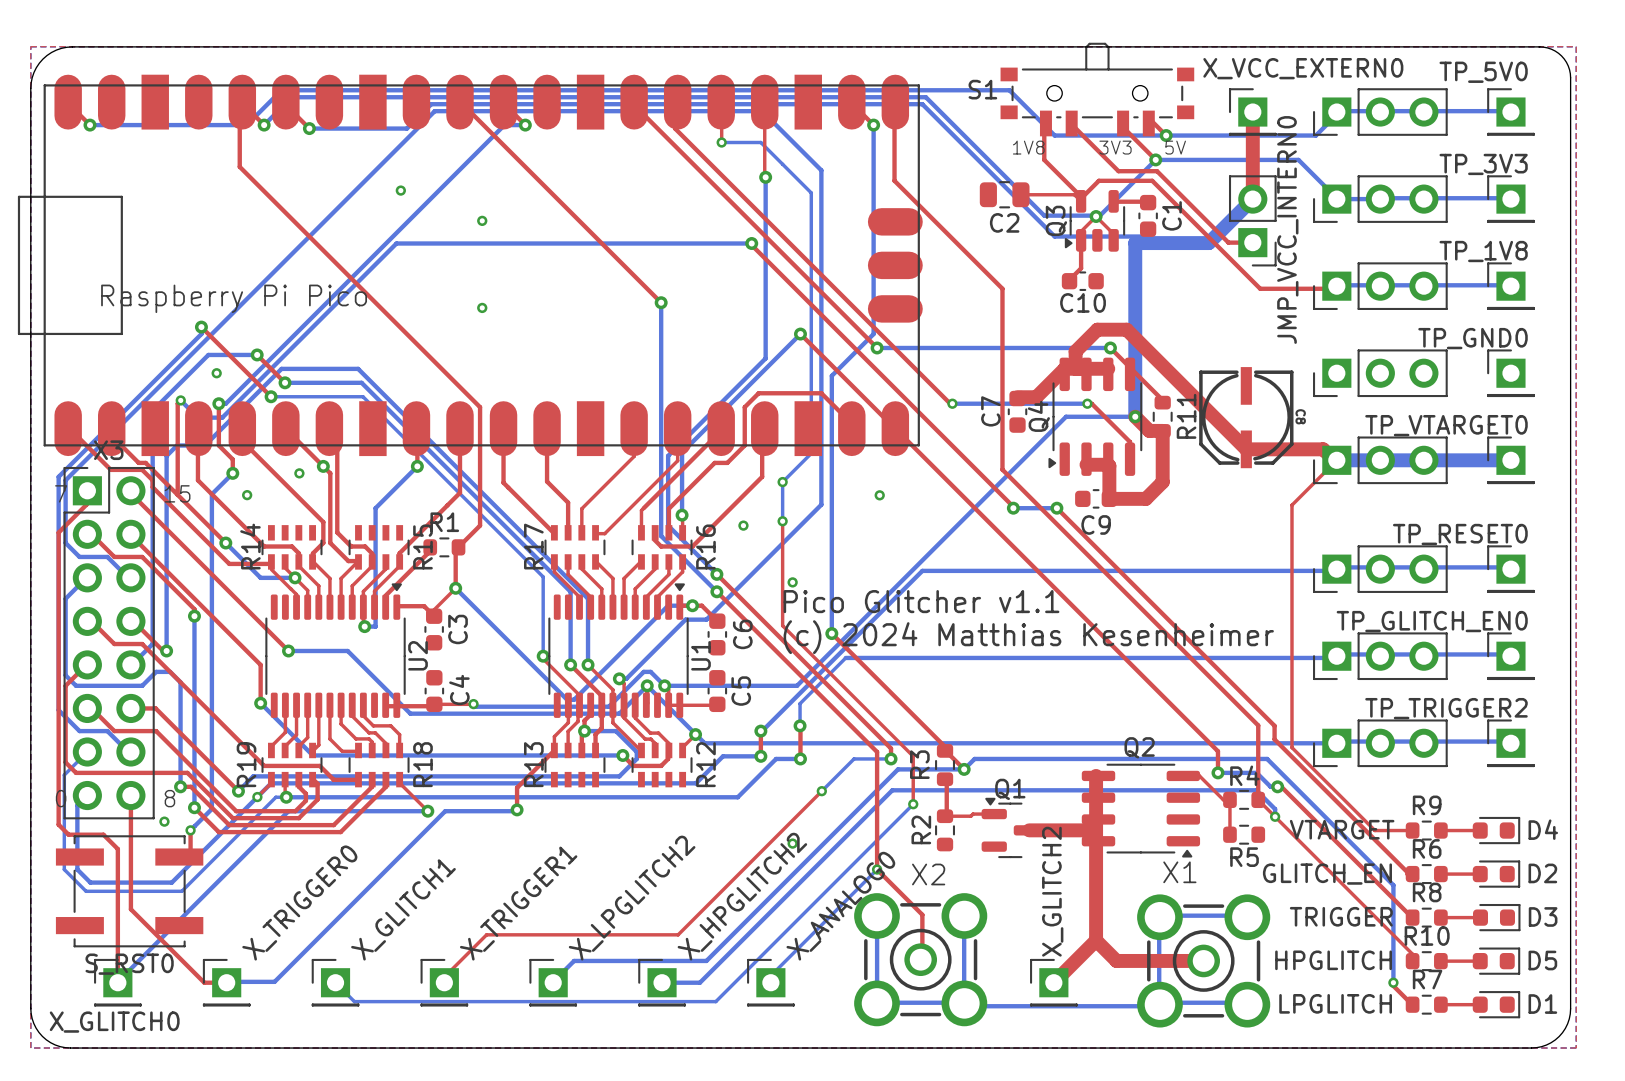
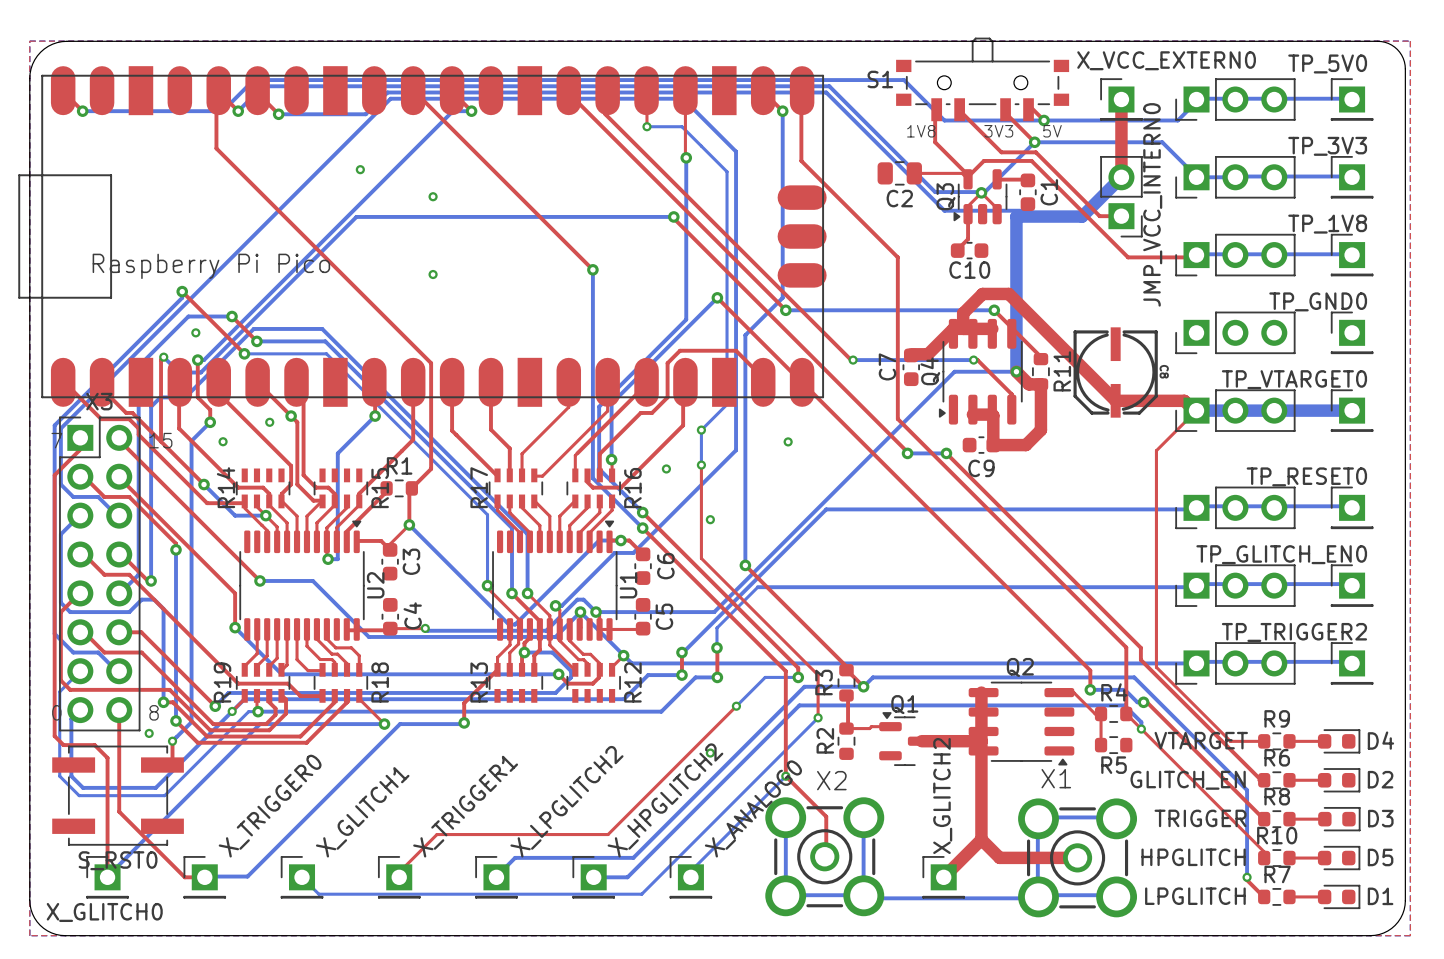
text: Pico Glitcher v1.1 (921, 601) -> none
text: (c) 2024 Matthias Kesenheimer (1028, 637) -> none

